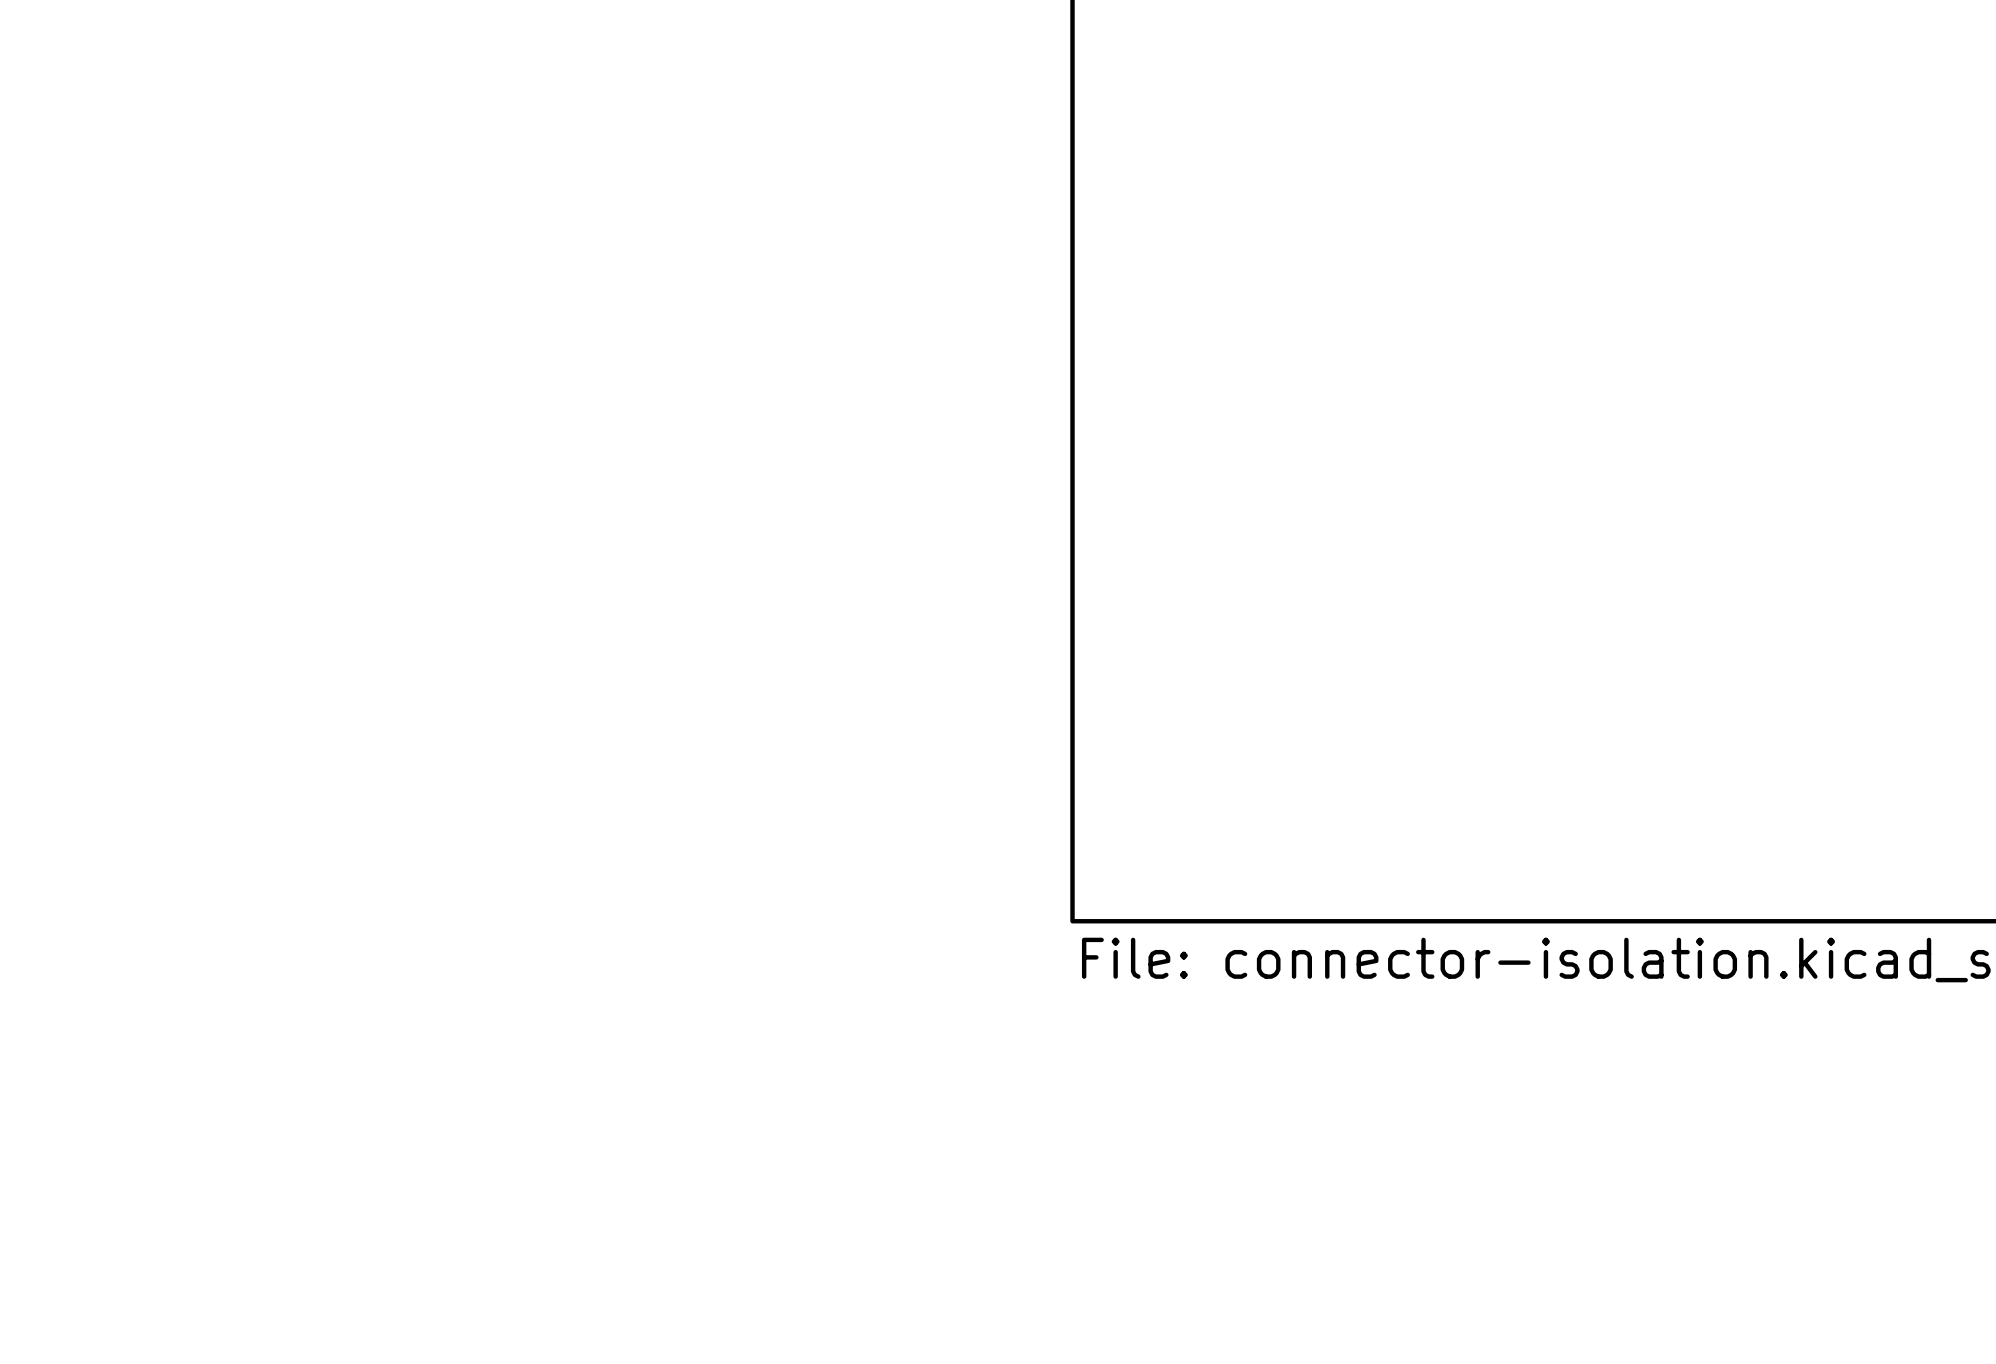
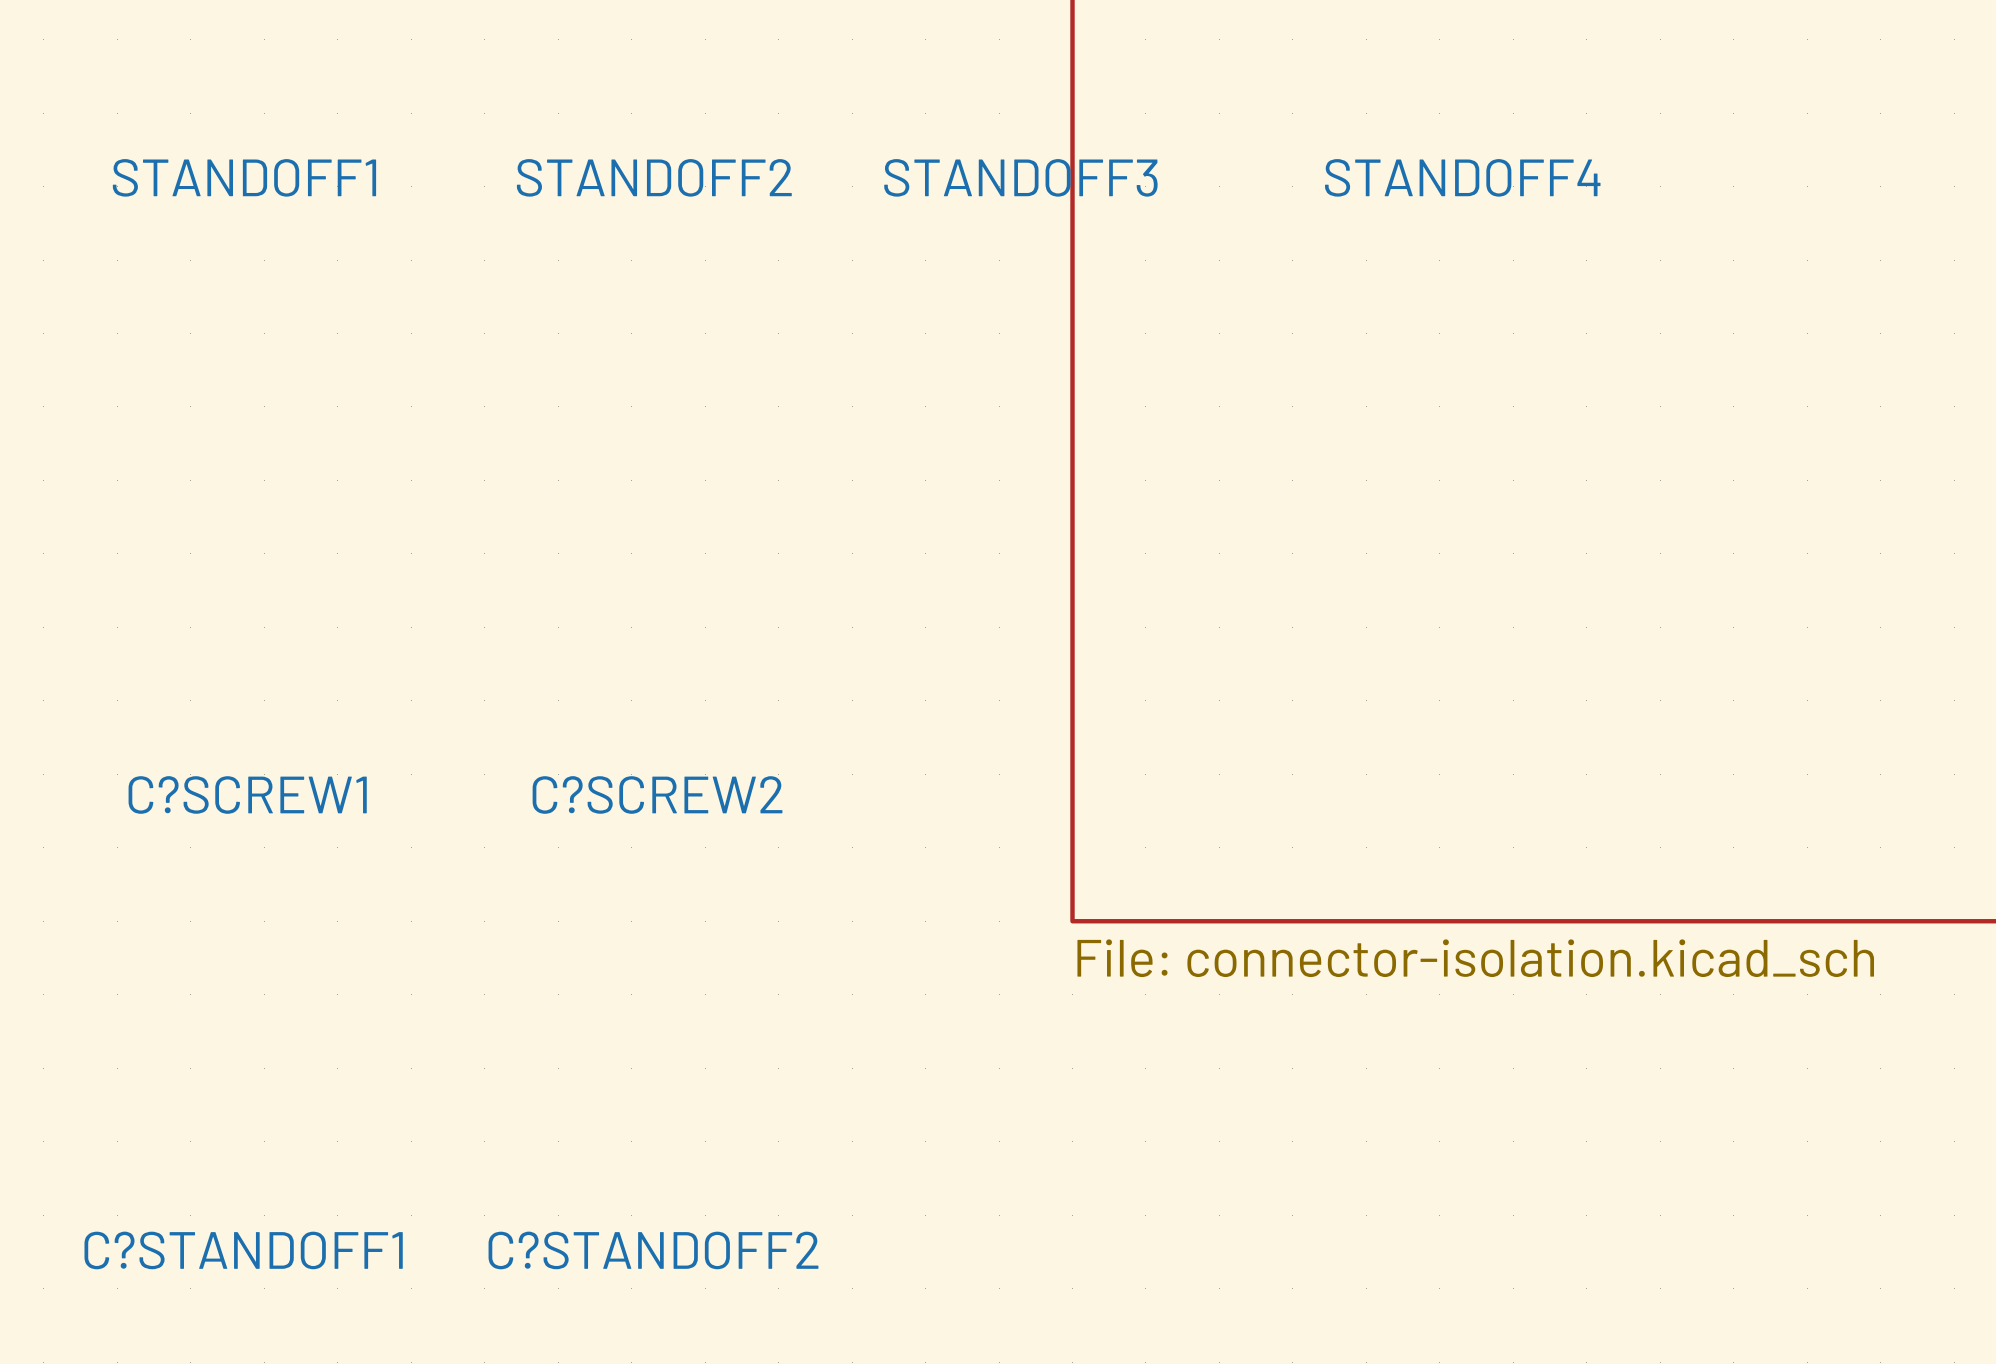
STANDOFF4: none -> (1462, 177)
STANDOFF1: none -> (244, 177)
STANDOFF2: none -> (654, 177)
STANDOFF3: none -> (1020, 177)
C?SCREW1: none -> (247, 794)
C?SCREW2: none -> (657, 794)
C?STANDOFF1: none -> (243, 1250)
C?STANDOFF2: none -> (653, 1250)

